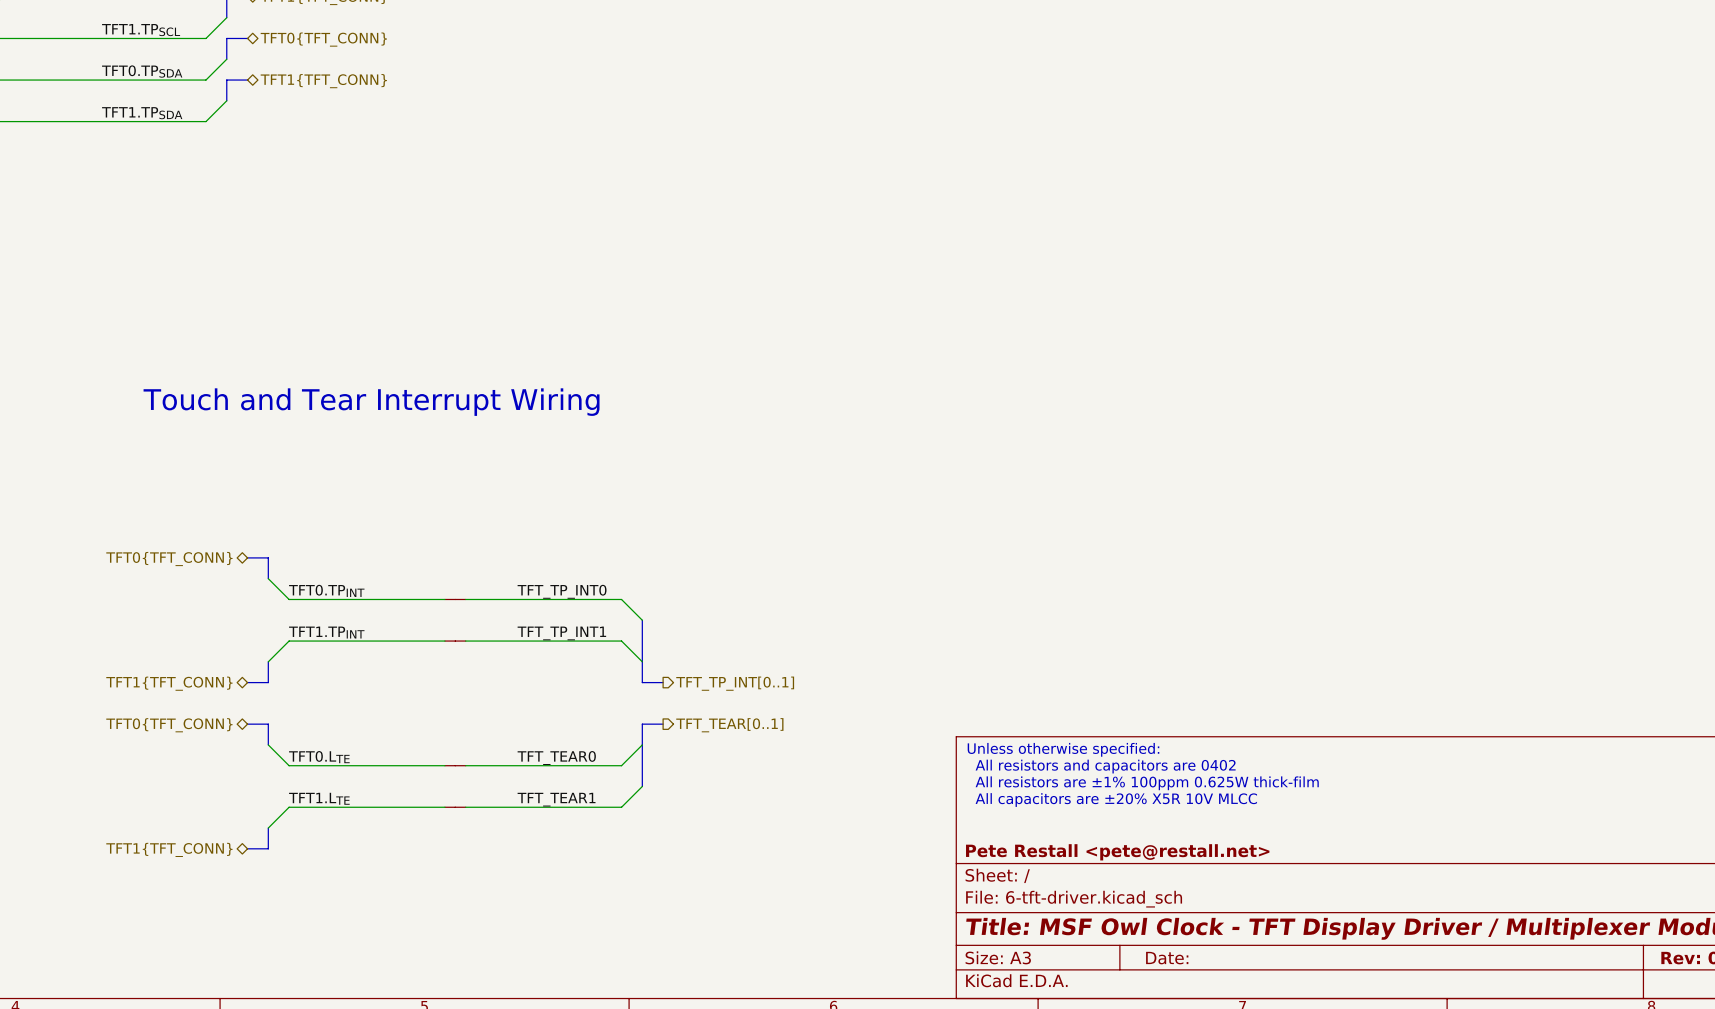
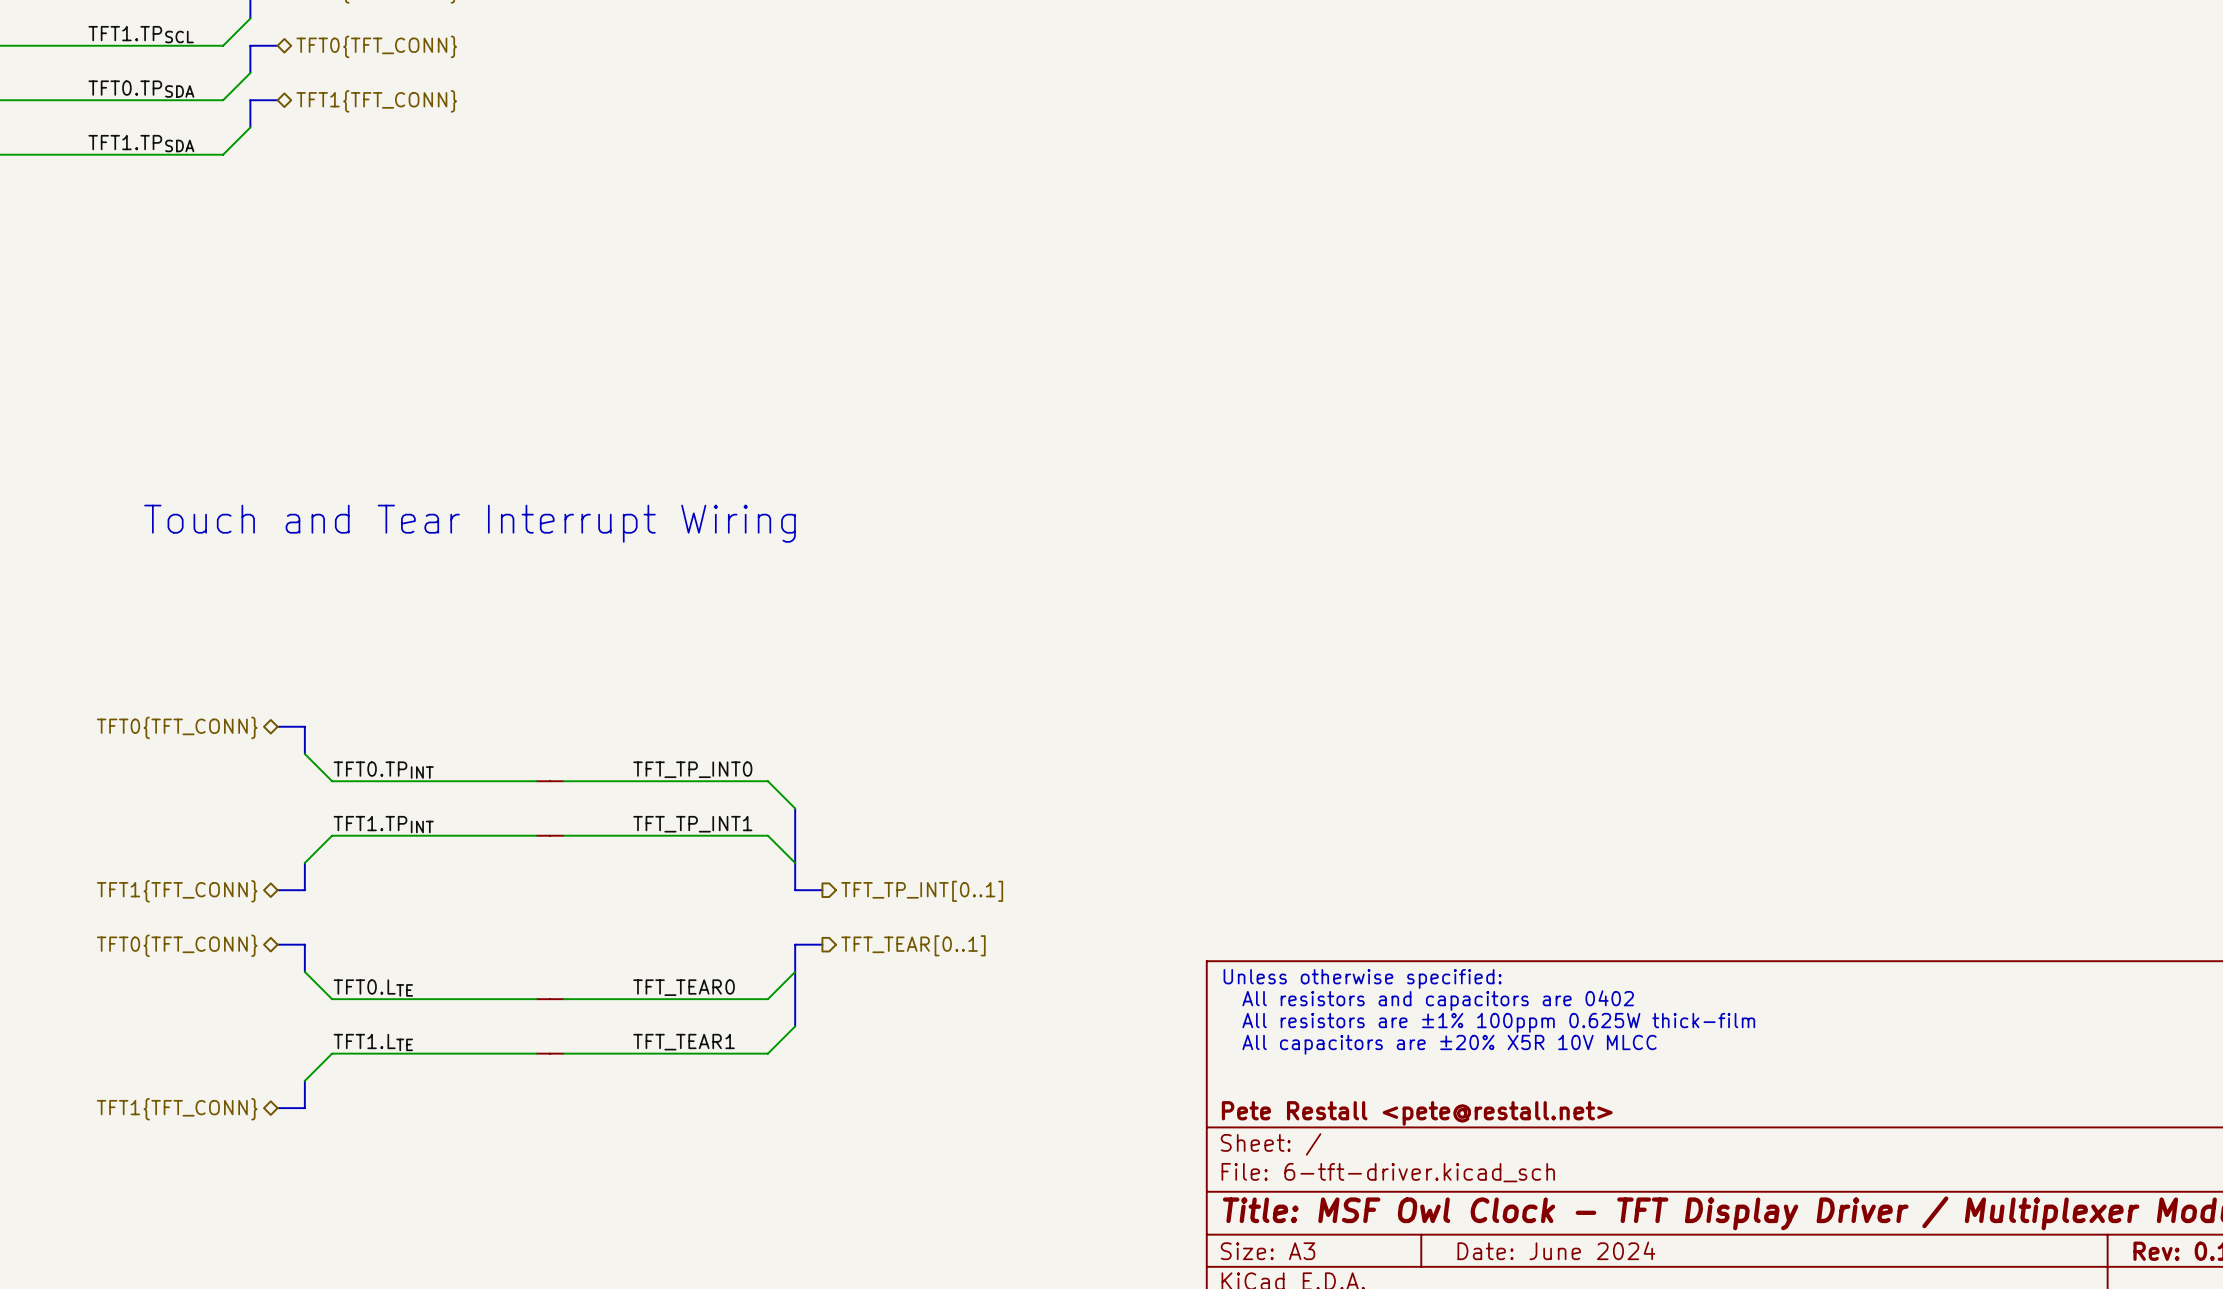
title block: Date: (1167, 958) -> Date: June 2024 (1556, 1250)

